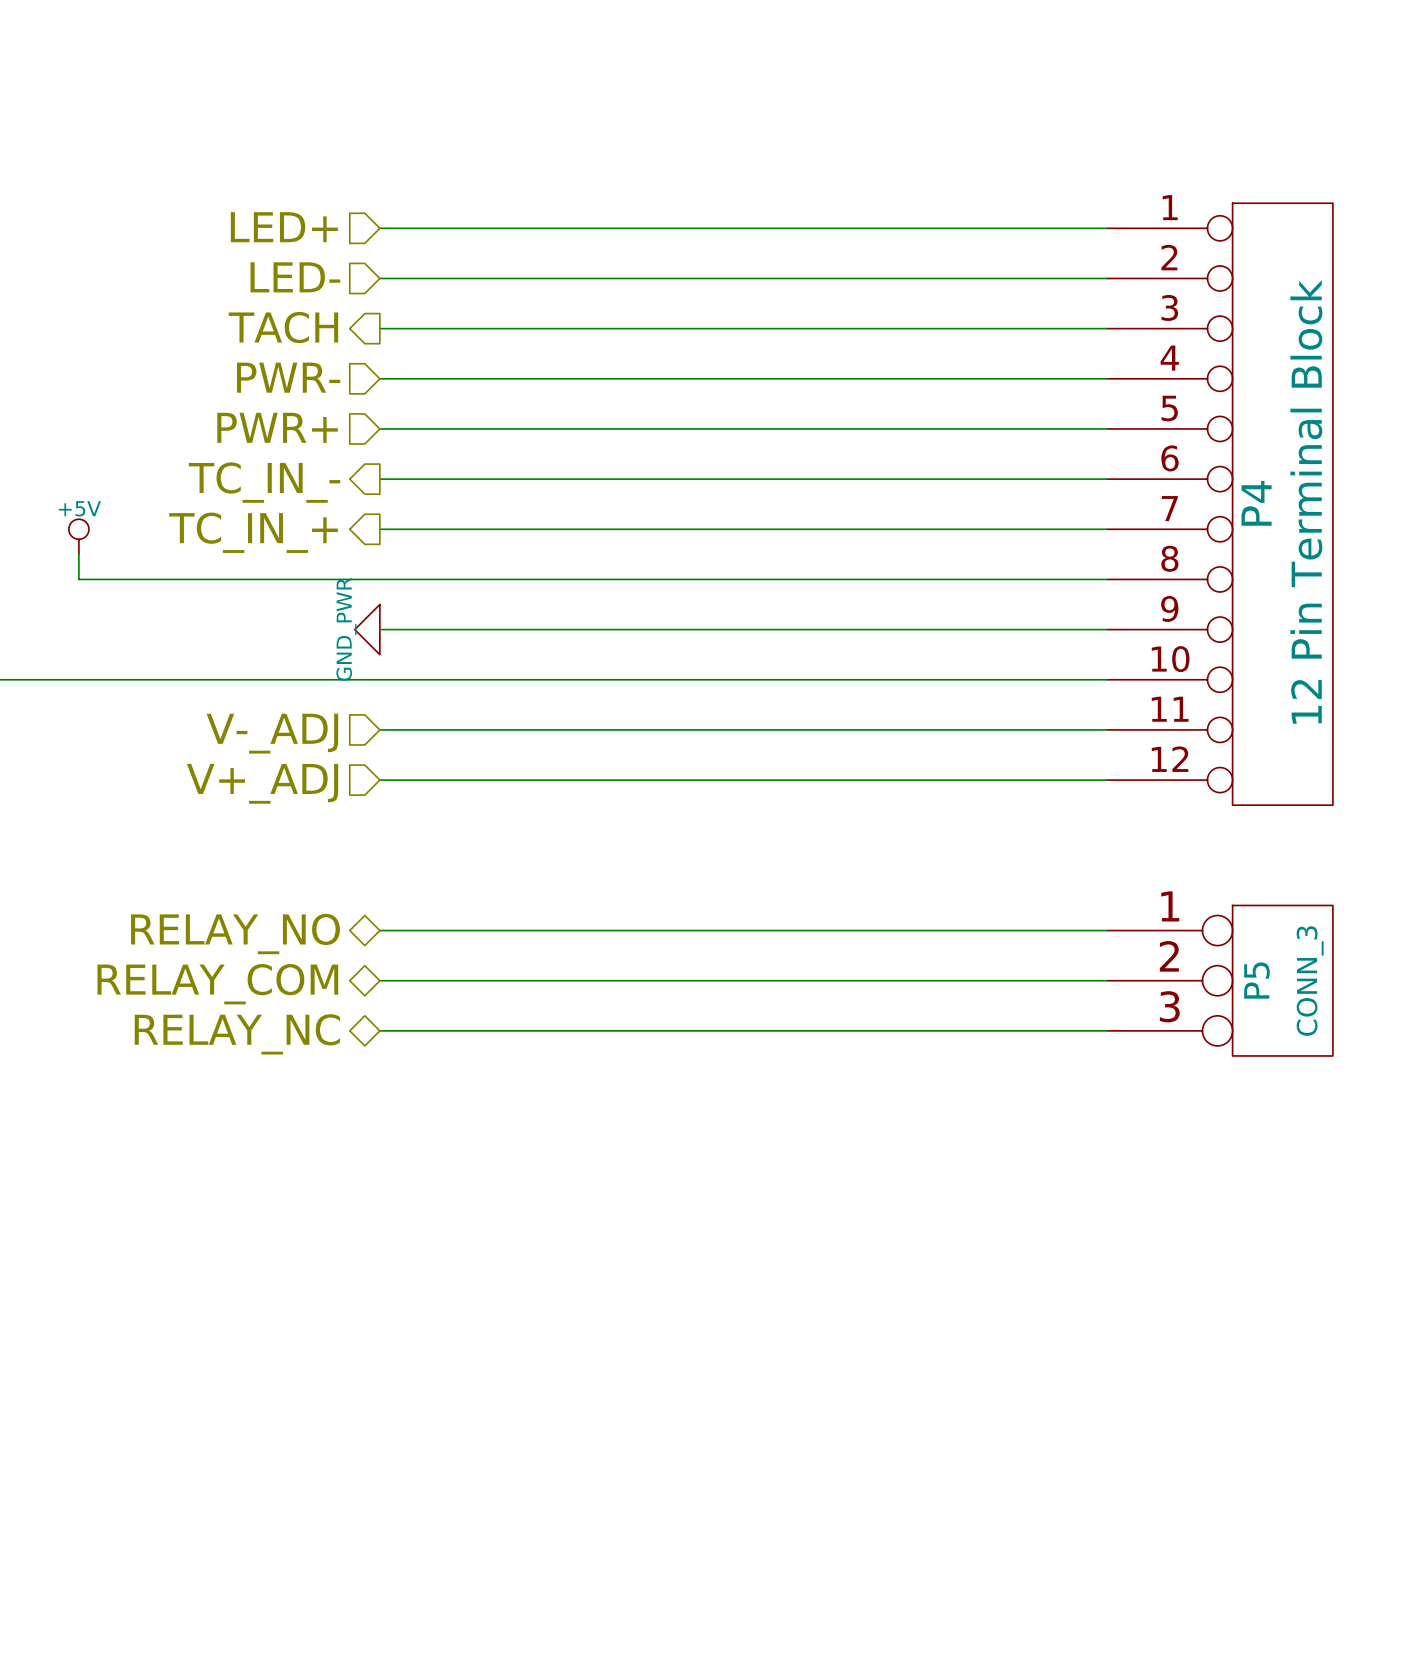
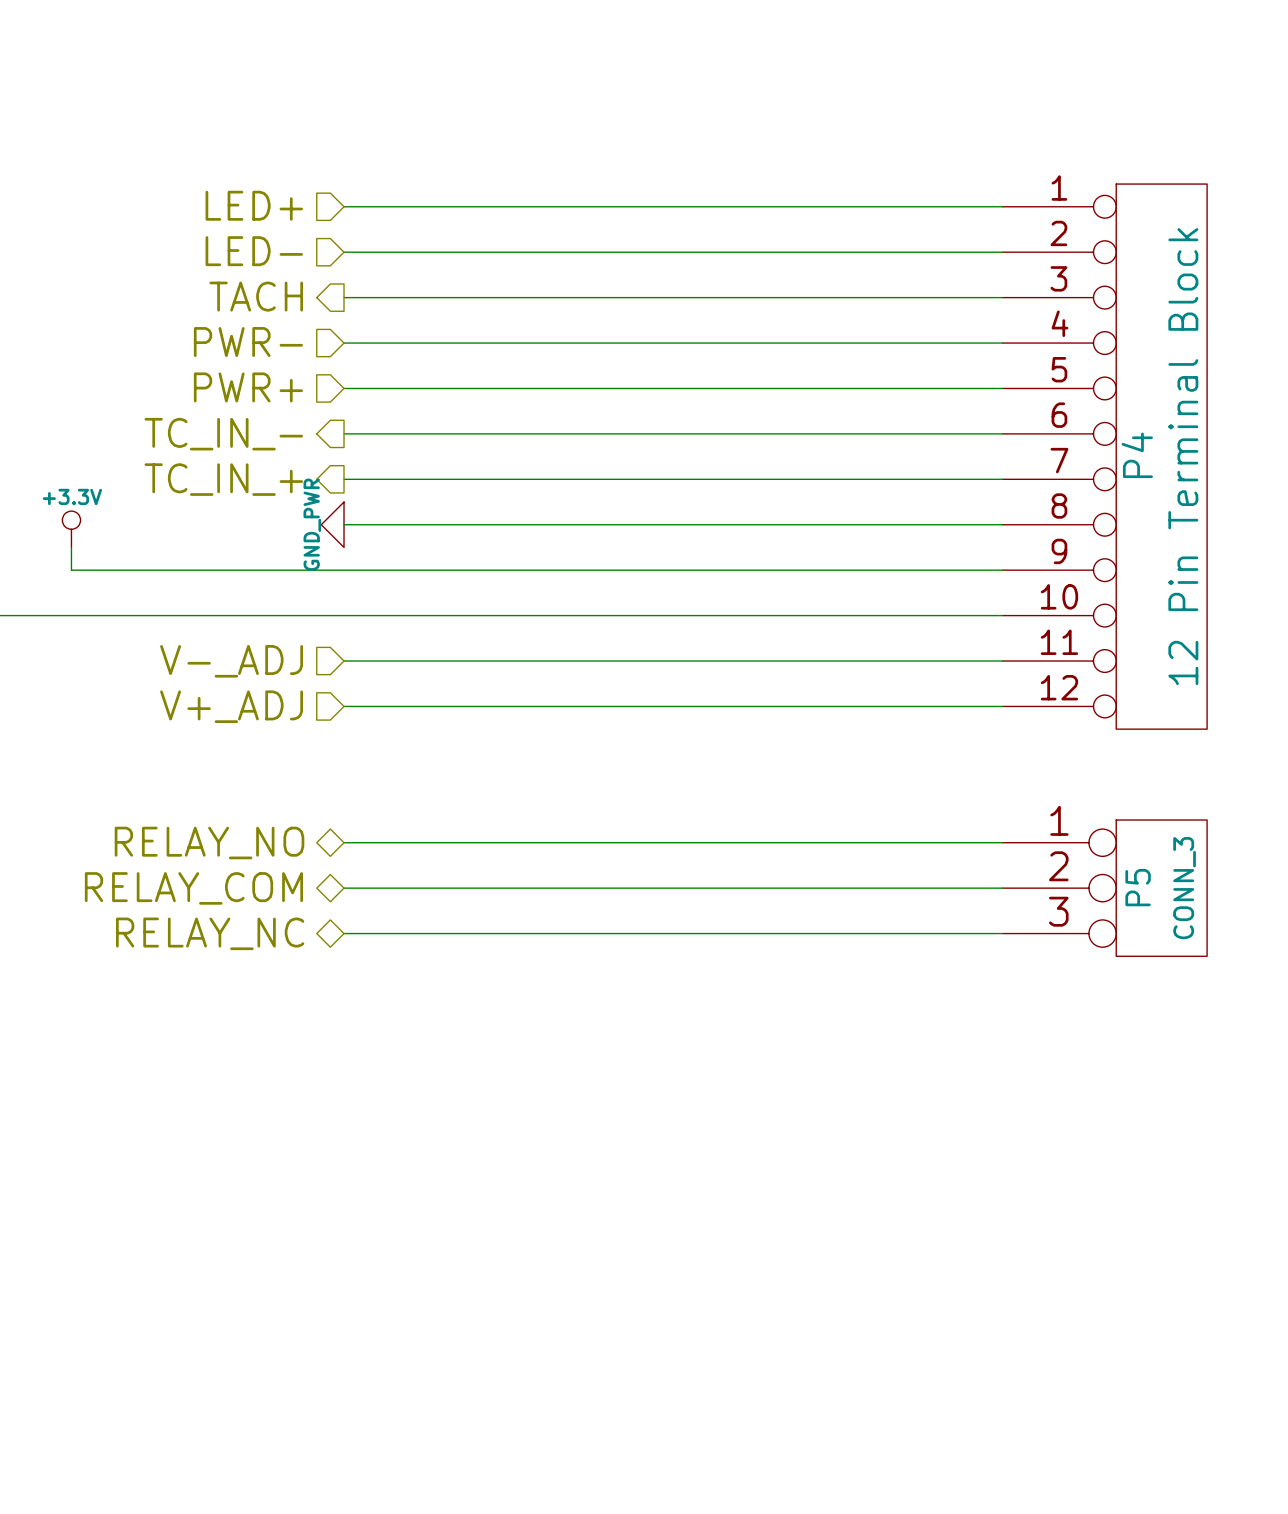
power symbol: +5V (78, 536) -> none
wire: (78, 554) (78, 579) (379, 579) -> (71, 547) (71, 570) (344, 570)
power symbol: none -> +3.3V (71, 529)
power symbol position: GND_PWR (367, 629) -> GND_PWR (332, 524)

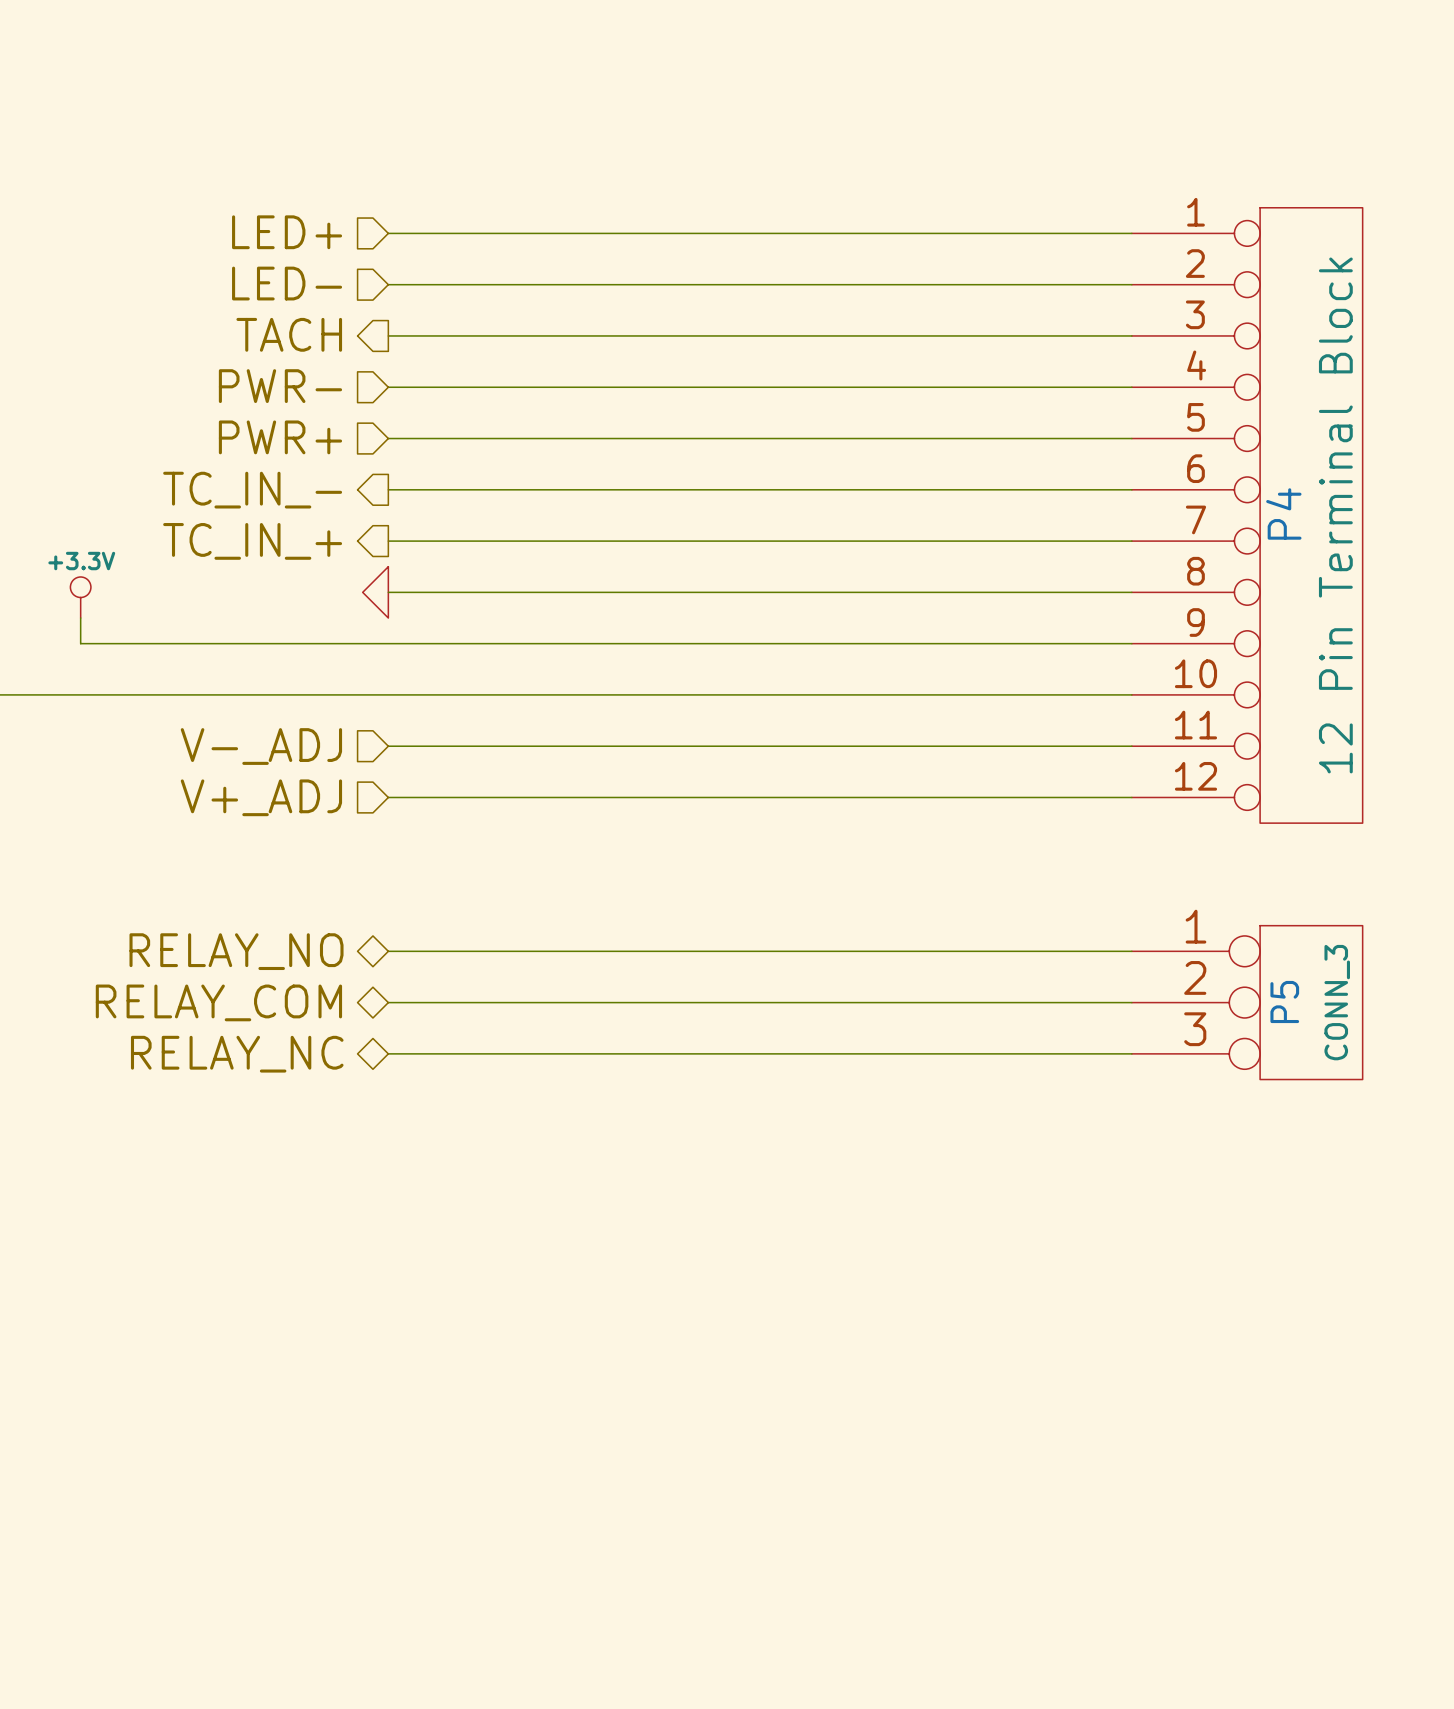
power symbol text: GND_PWR (312, 524) -> none

